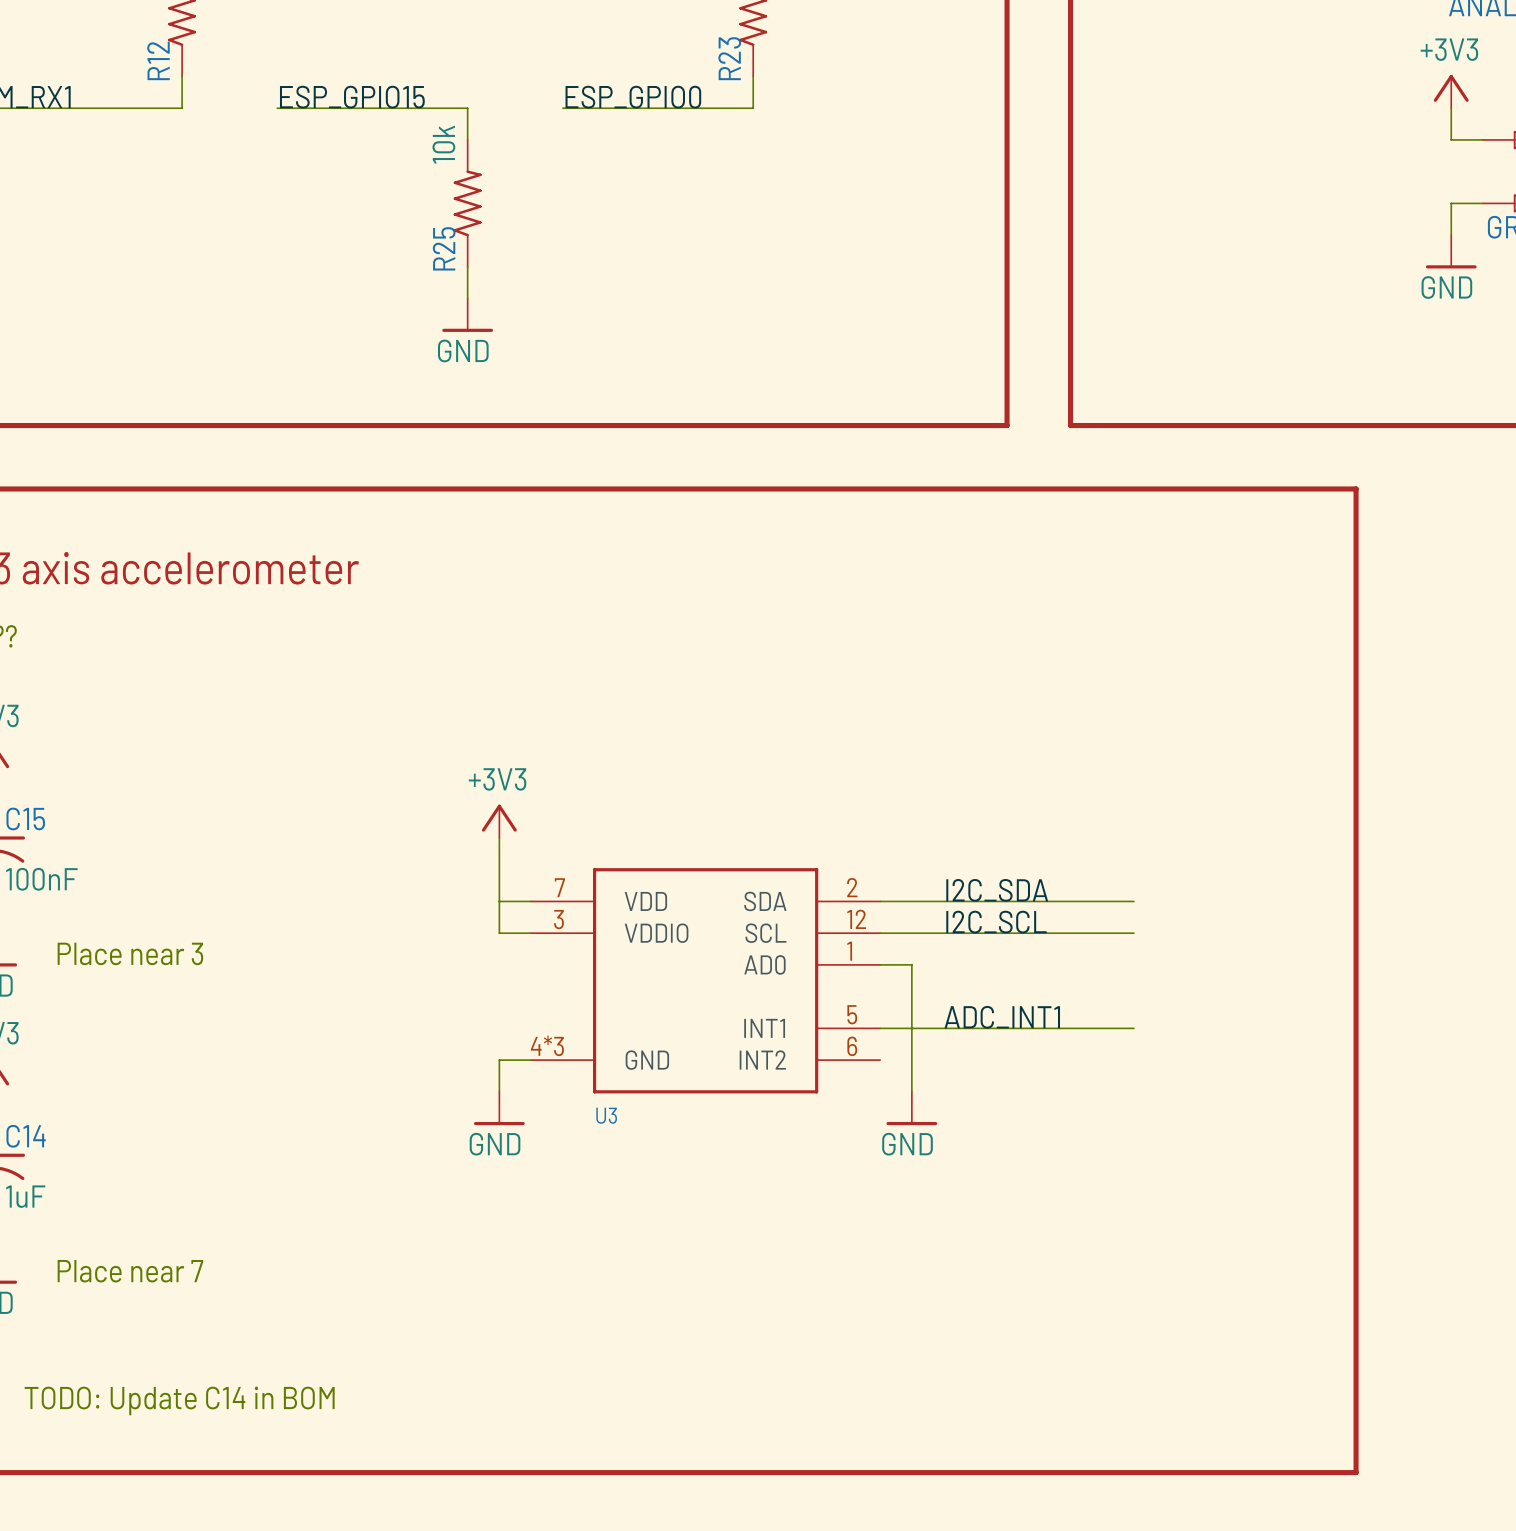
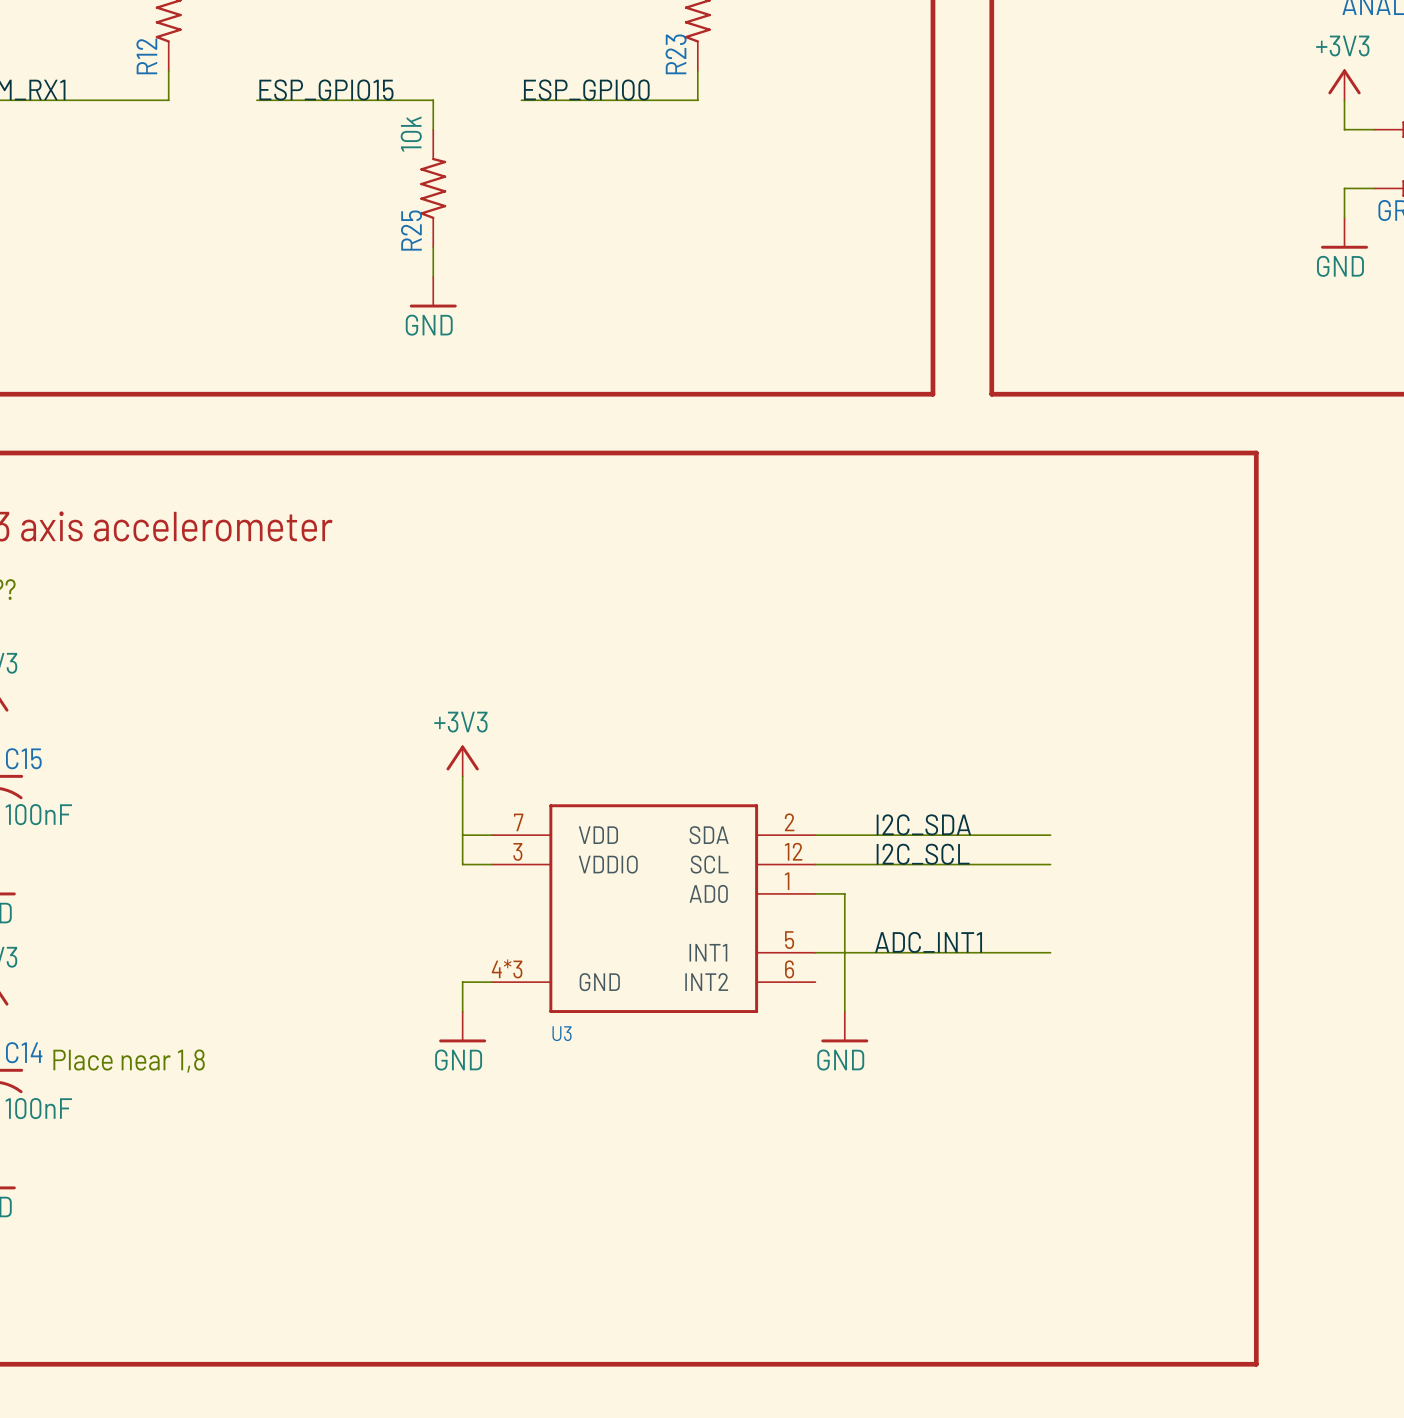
text: Place near 3 (130, 953) -> none
text: none -> Place near 1,8 (129, 1061)
C14 value: 1uF (25, 1196) -> 100nF (38, 1108)
text: Place near 7 (130, 1271) -> none
text: TODO: Update C14 in BOM (179, 1400) -> none

